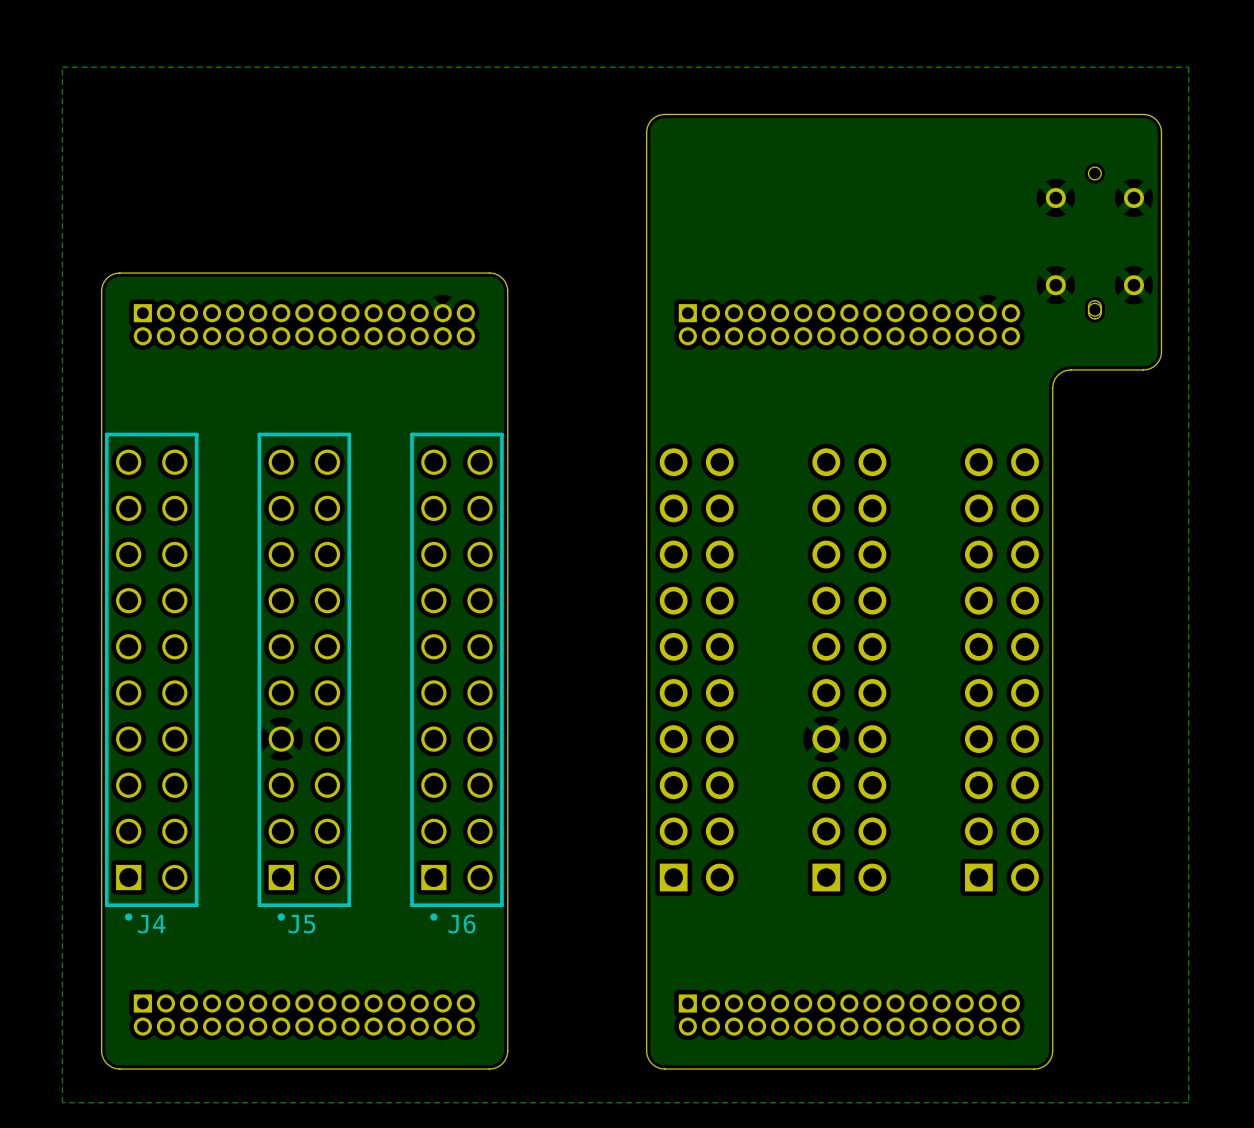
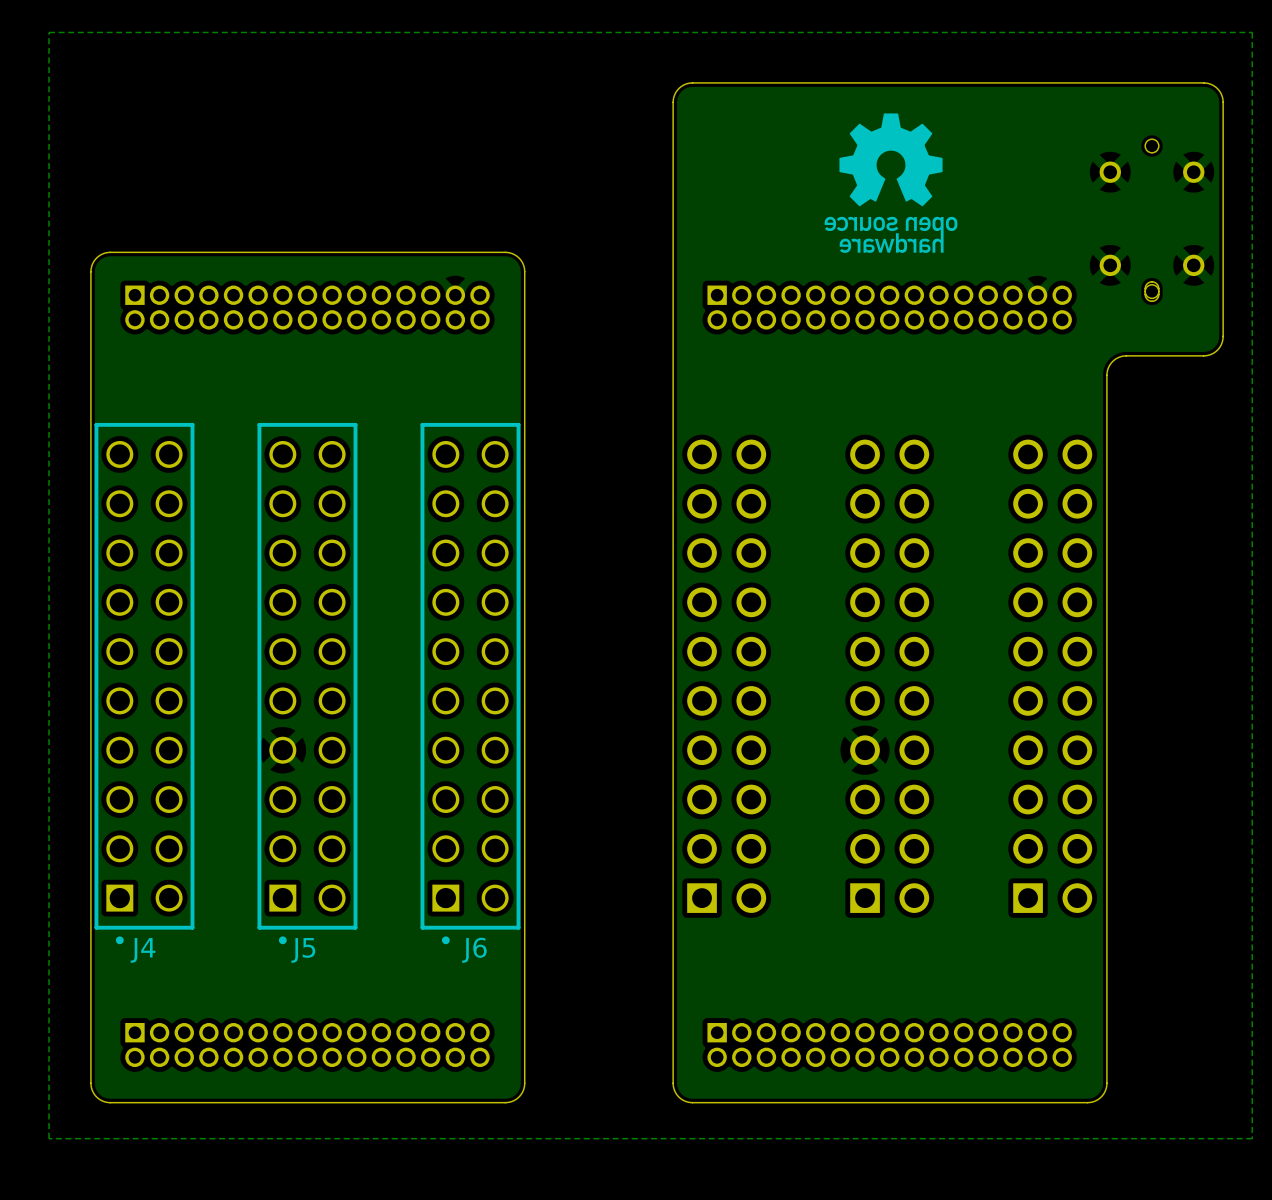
drawing: none -> [824, 113, 958, 253]

